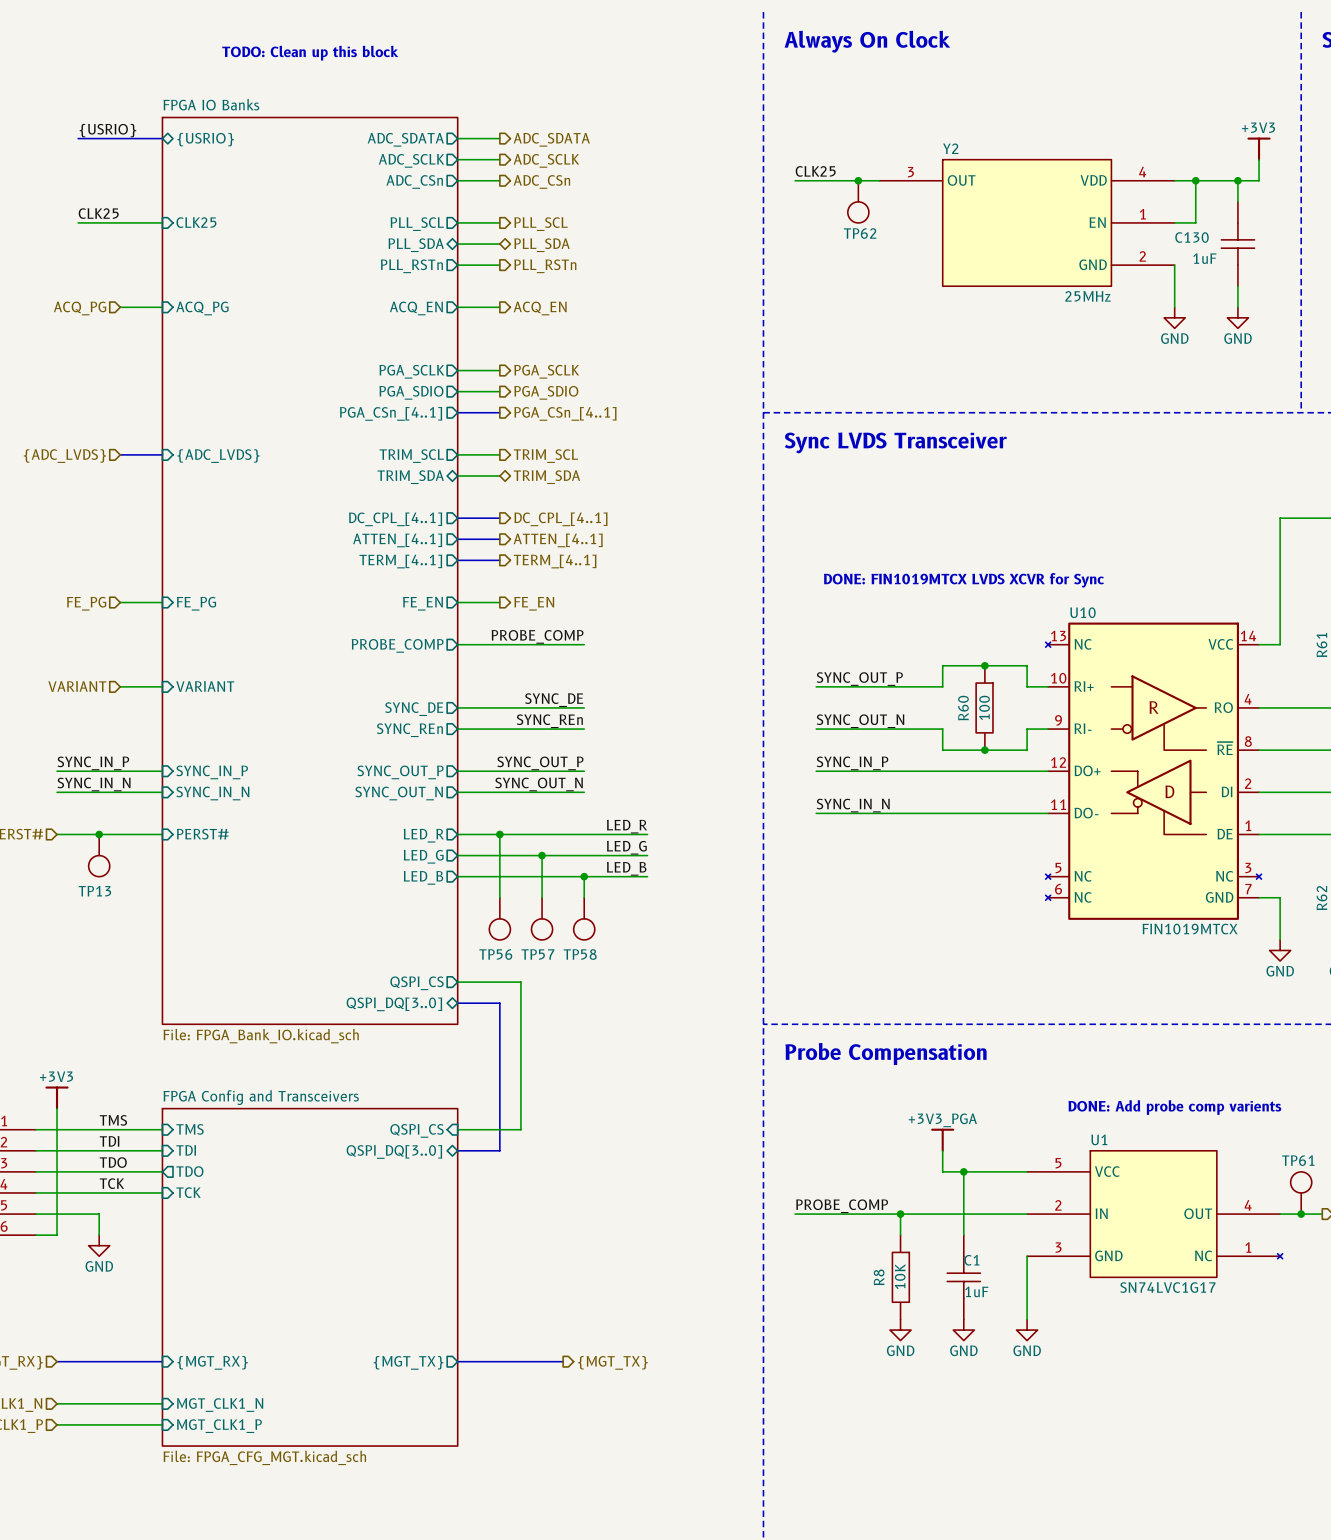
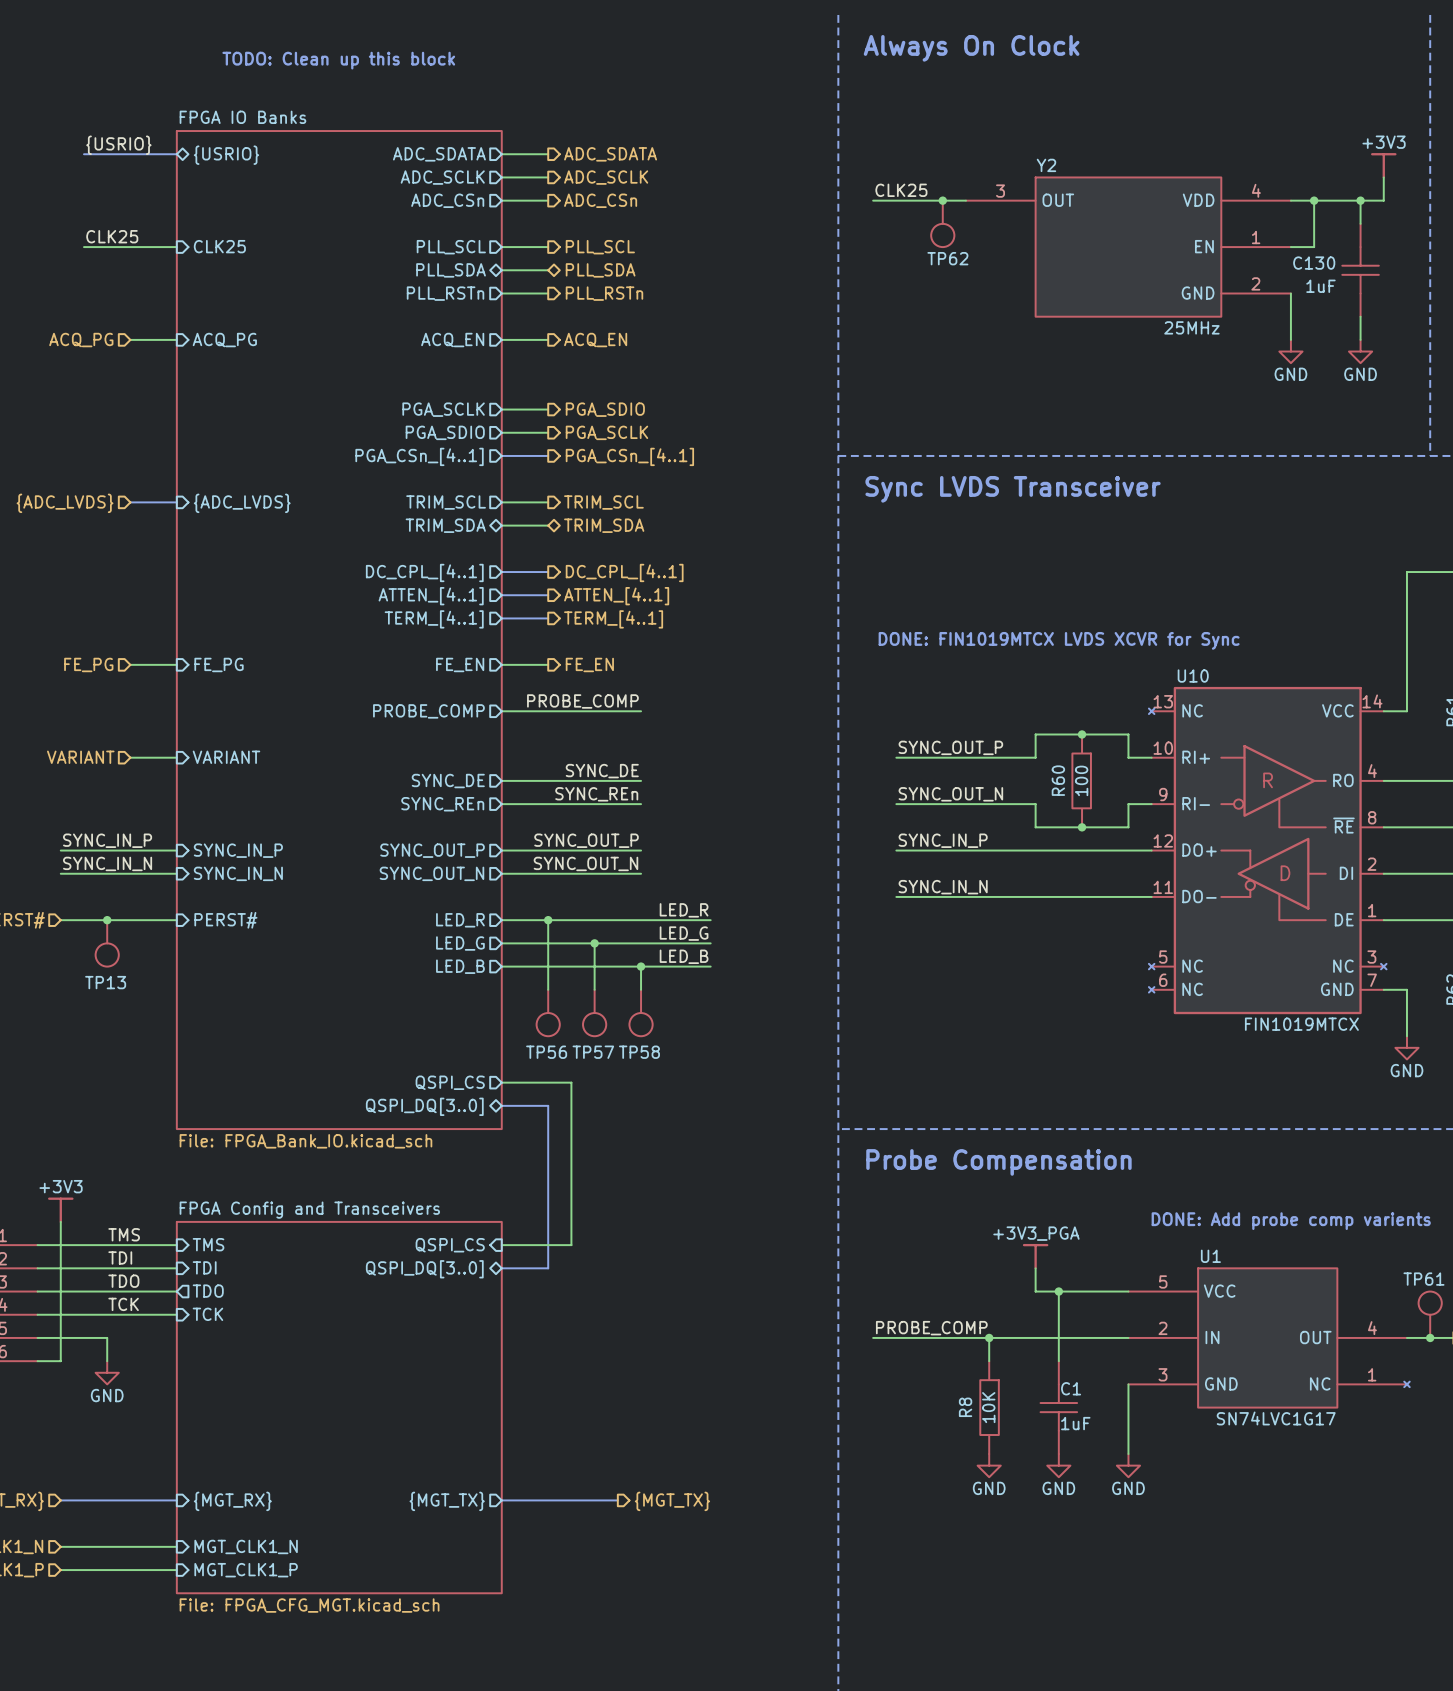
hierarchical label: PGA_SCLK (546, 371) -> PGA_SDIO (605, 409)
hierarchical label: PGA_SDIO (546, 392) -> PGA_SCLK (606, 432)

